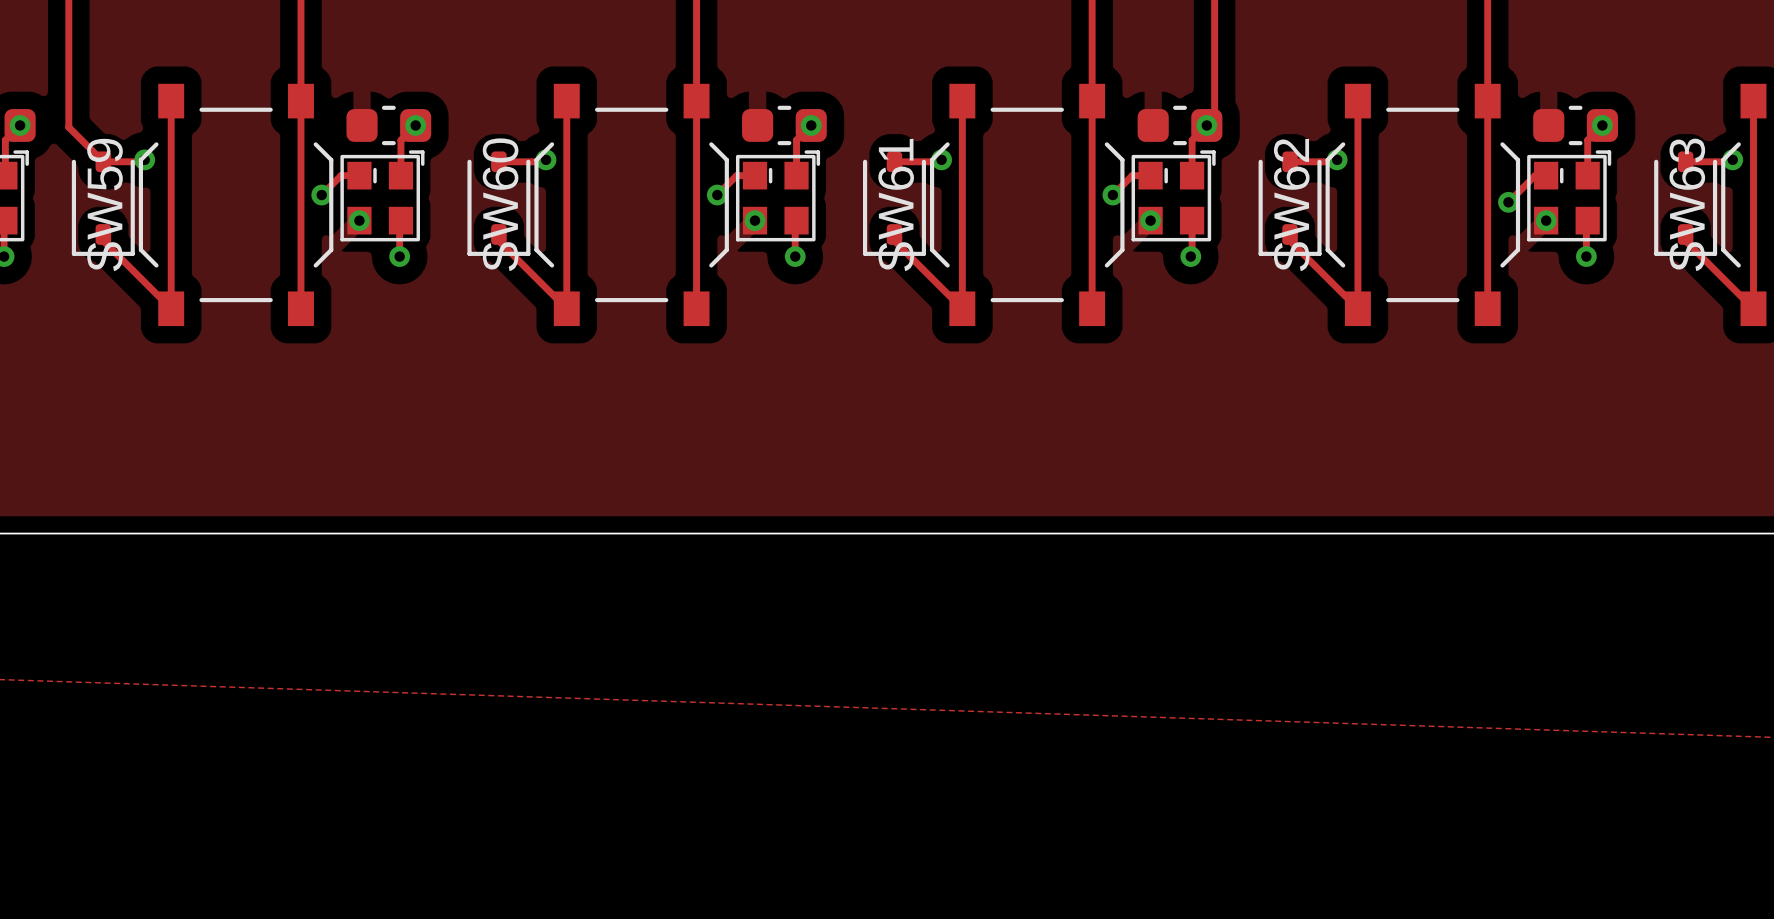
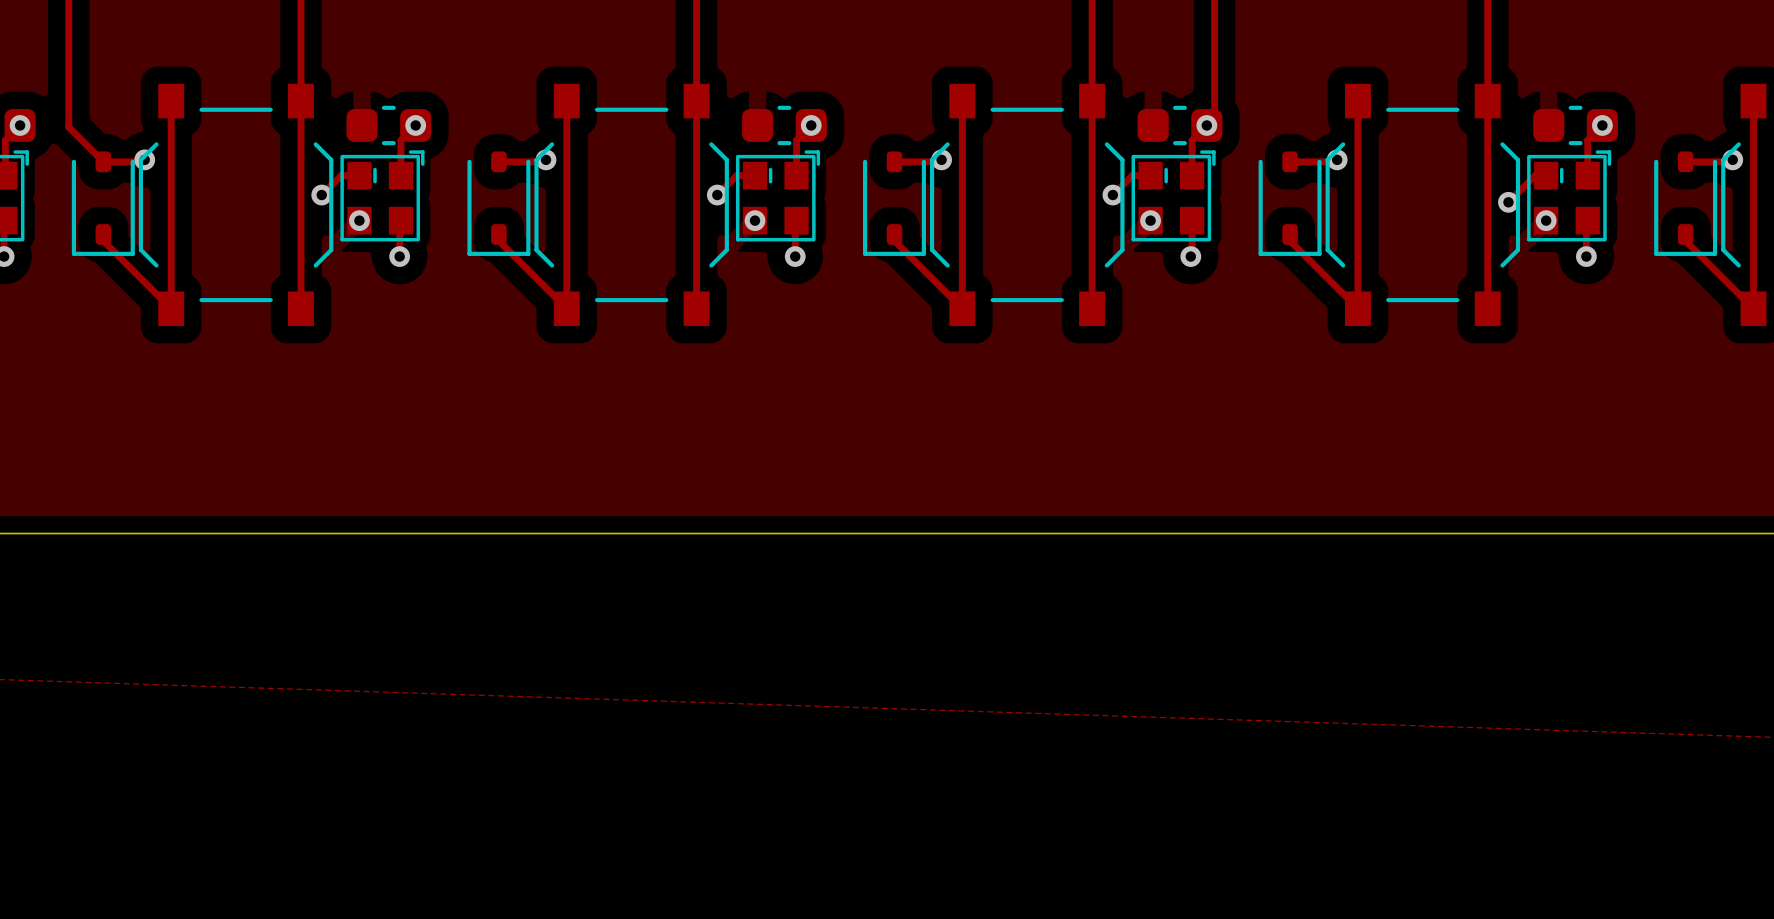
SW59 name: SW59 (105, 204) -> none
SW60 name: SW60 (500, 204) -> none
SW63 name: SW63 (1687, 204) -> none
SW61 name: SW61 (896, 205) -> none
SW62 name: SW62 (1291, 205) -> none

